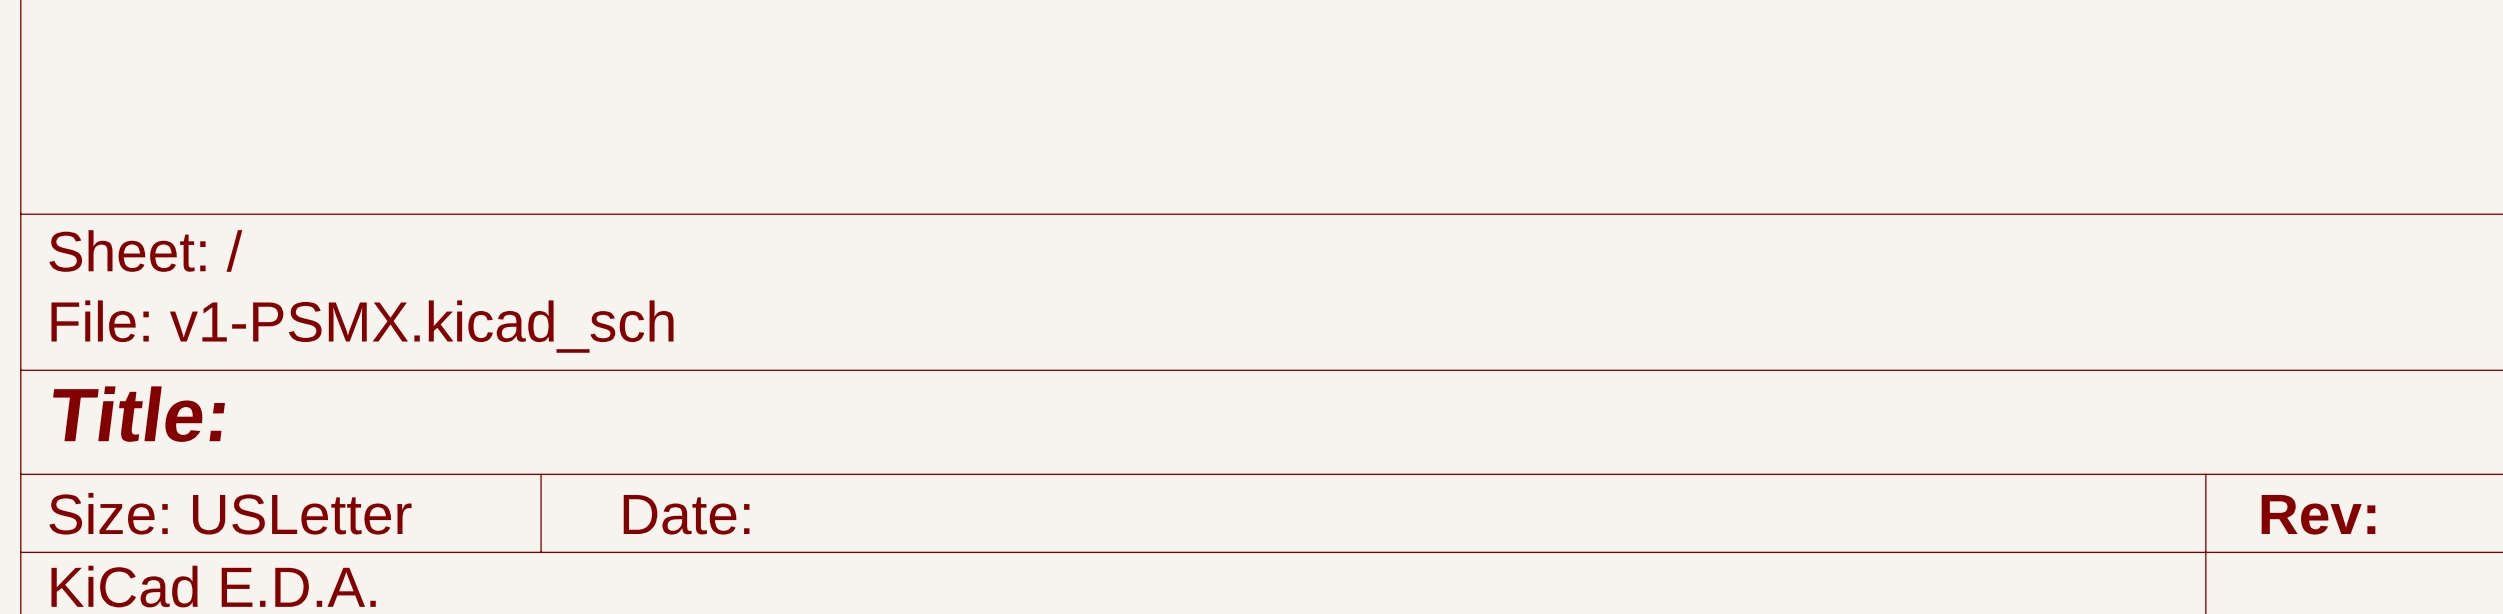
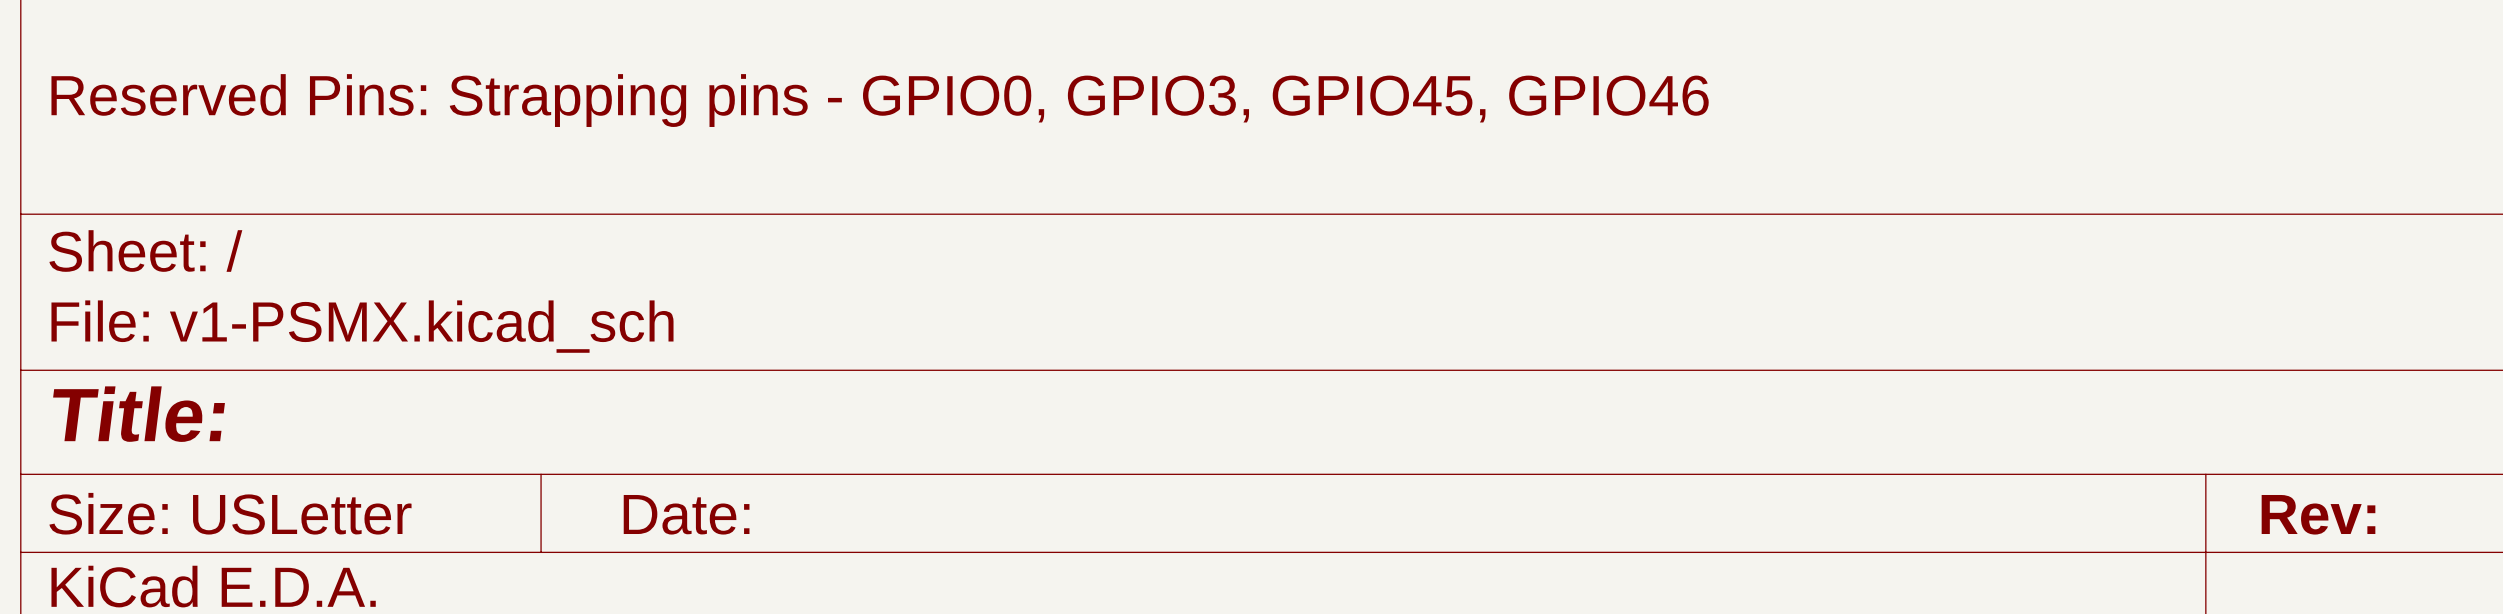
title block: none -> Reserved Pins: Strapping pins - GPIO0, GPIO3, GPIO45, GPIO46 (880, 100)

